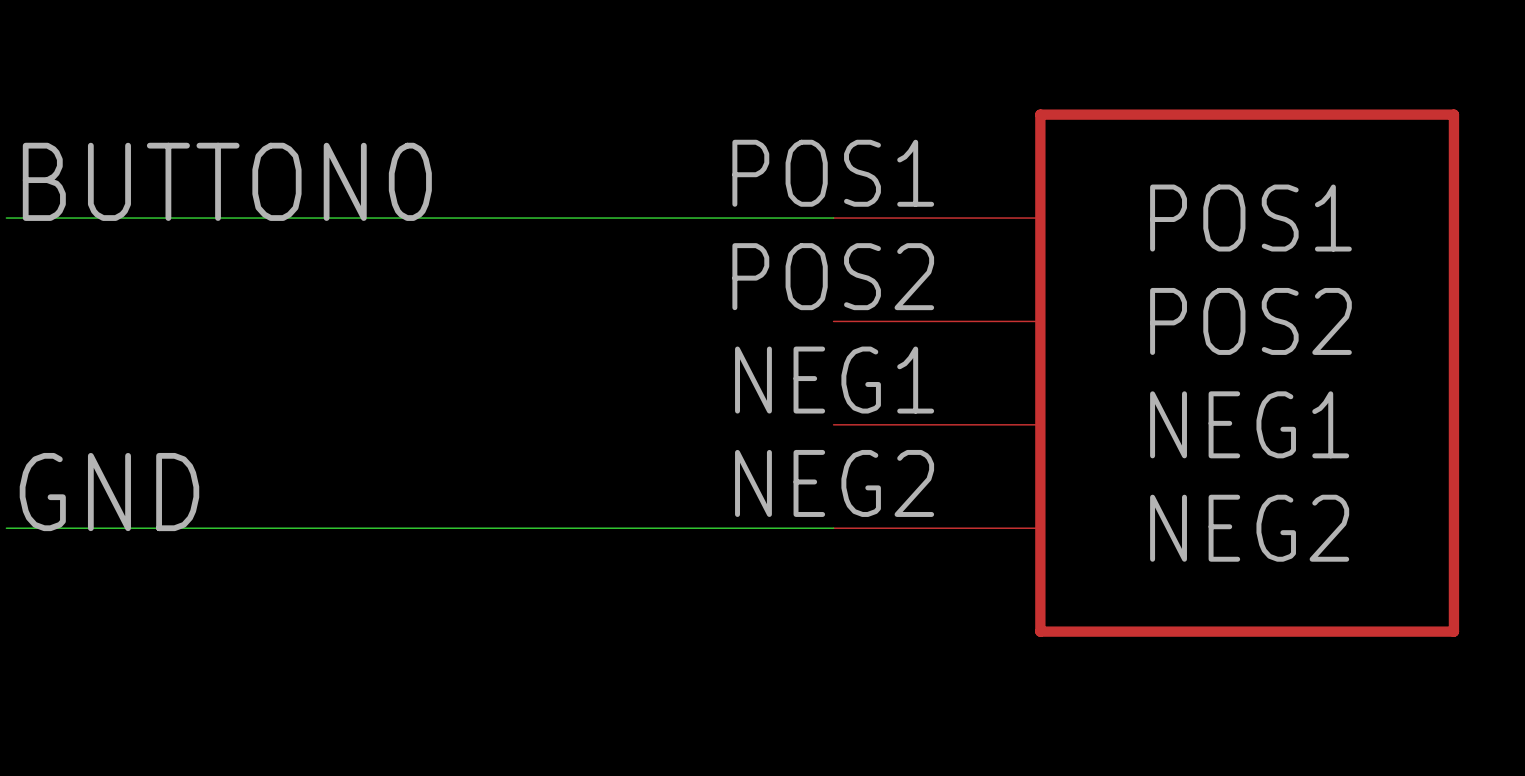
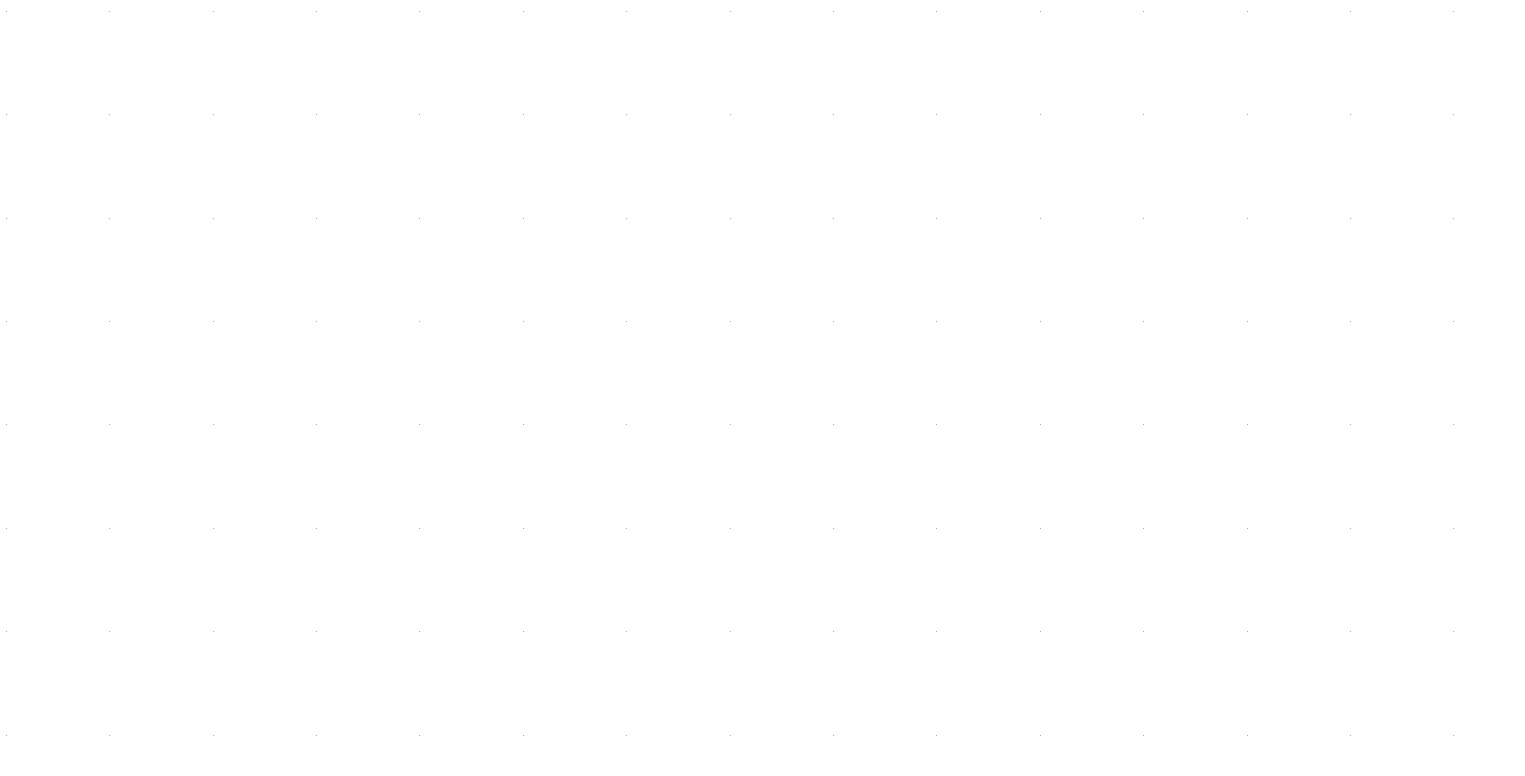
label: BUTTON0 (227, 181) -> none
wire: (6, 218) (833, 218) -> none
part: (1146, 373) -> none
label: GND (109, 492) -> none
wire: (6, 528) (833, 528) -> none

